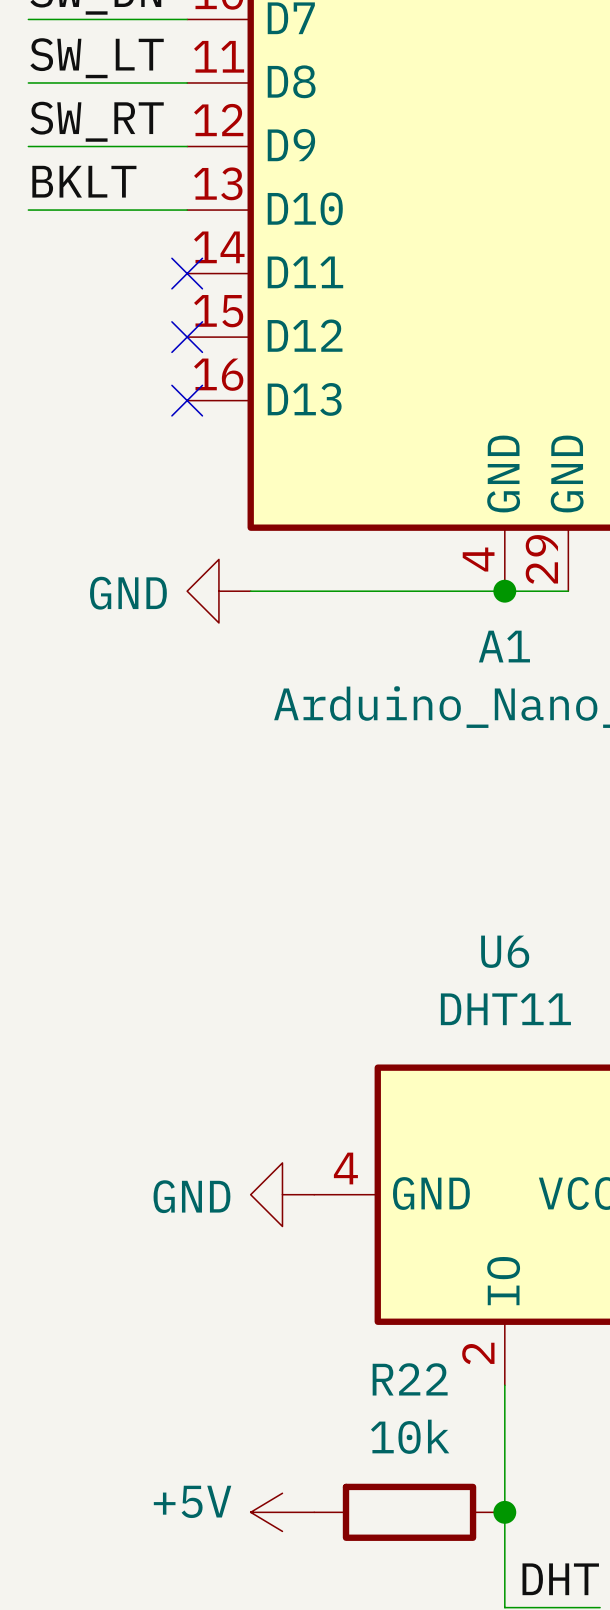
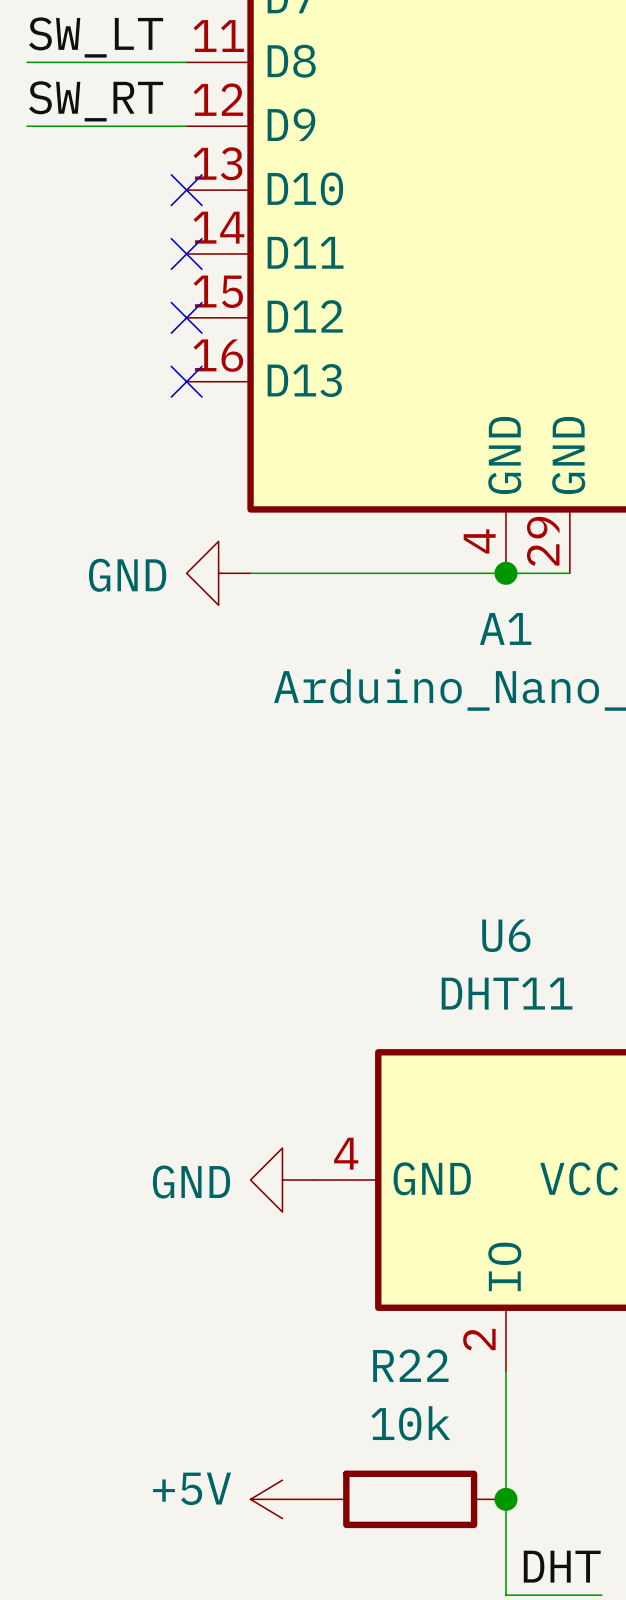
label: BKLT (84, 181) -> none
wire: (28, 210) (187, 210) -> none
no-connect mark: none -> (186, 190)

